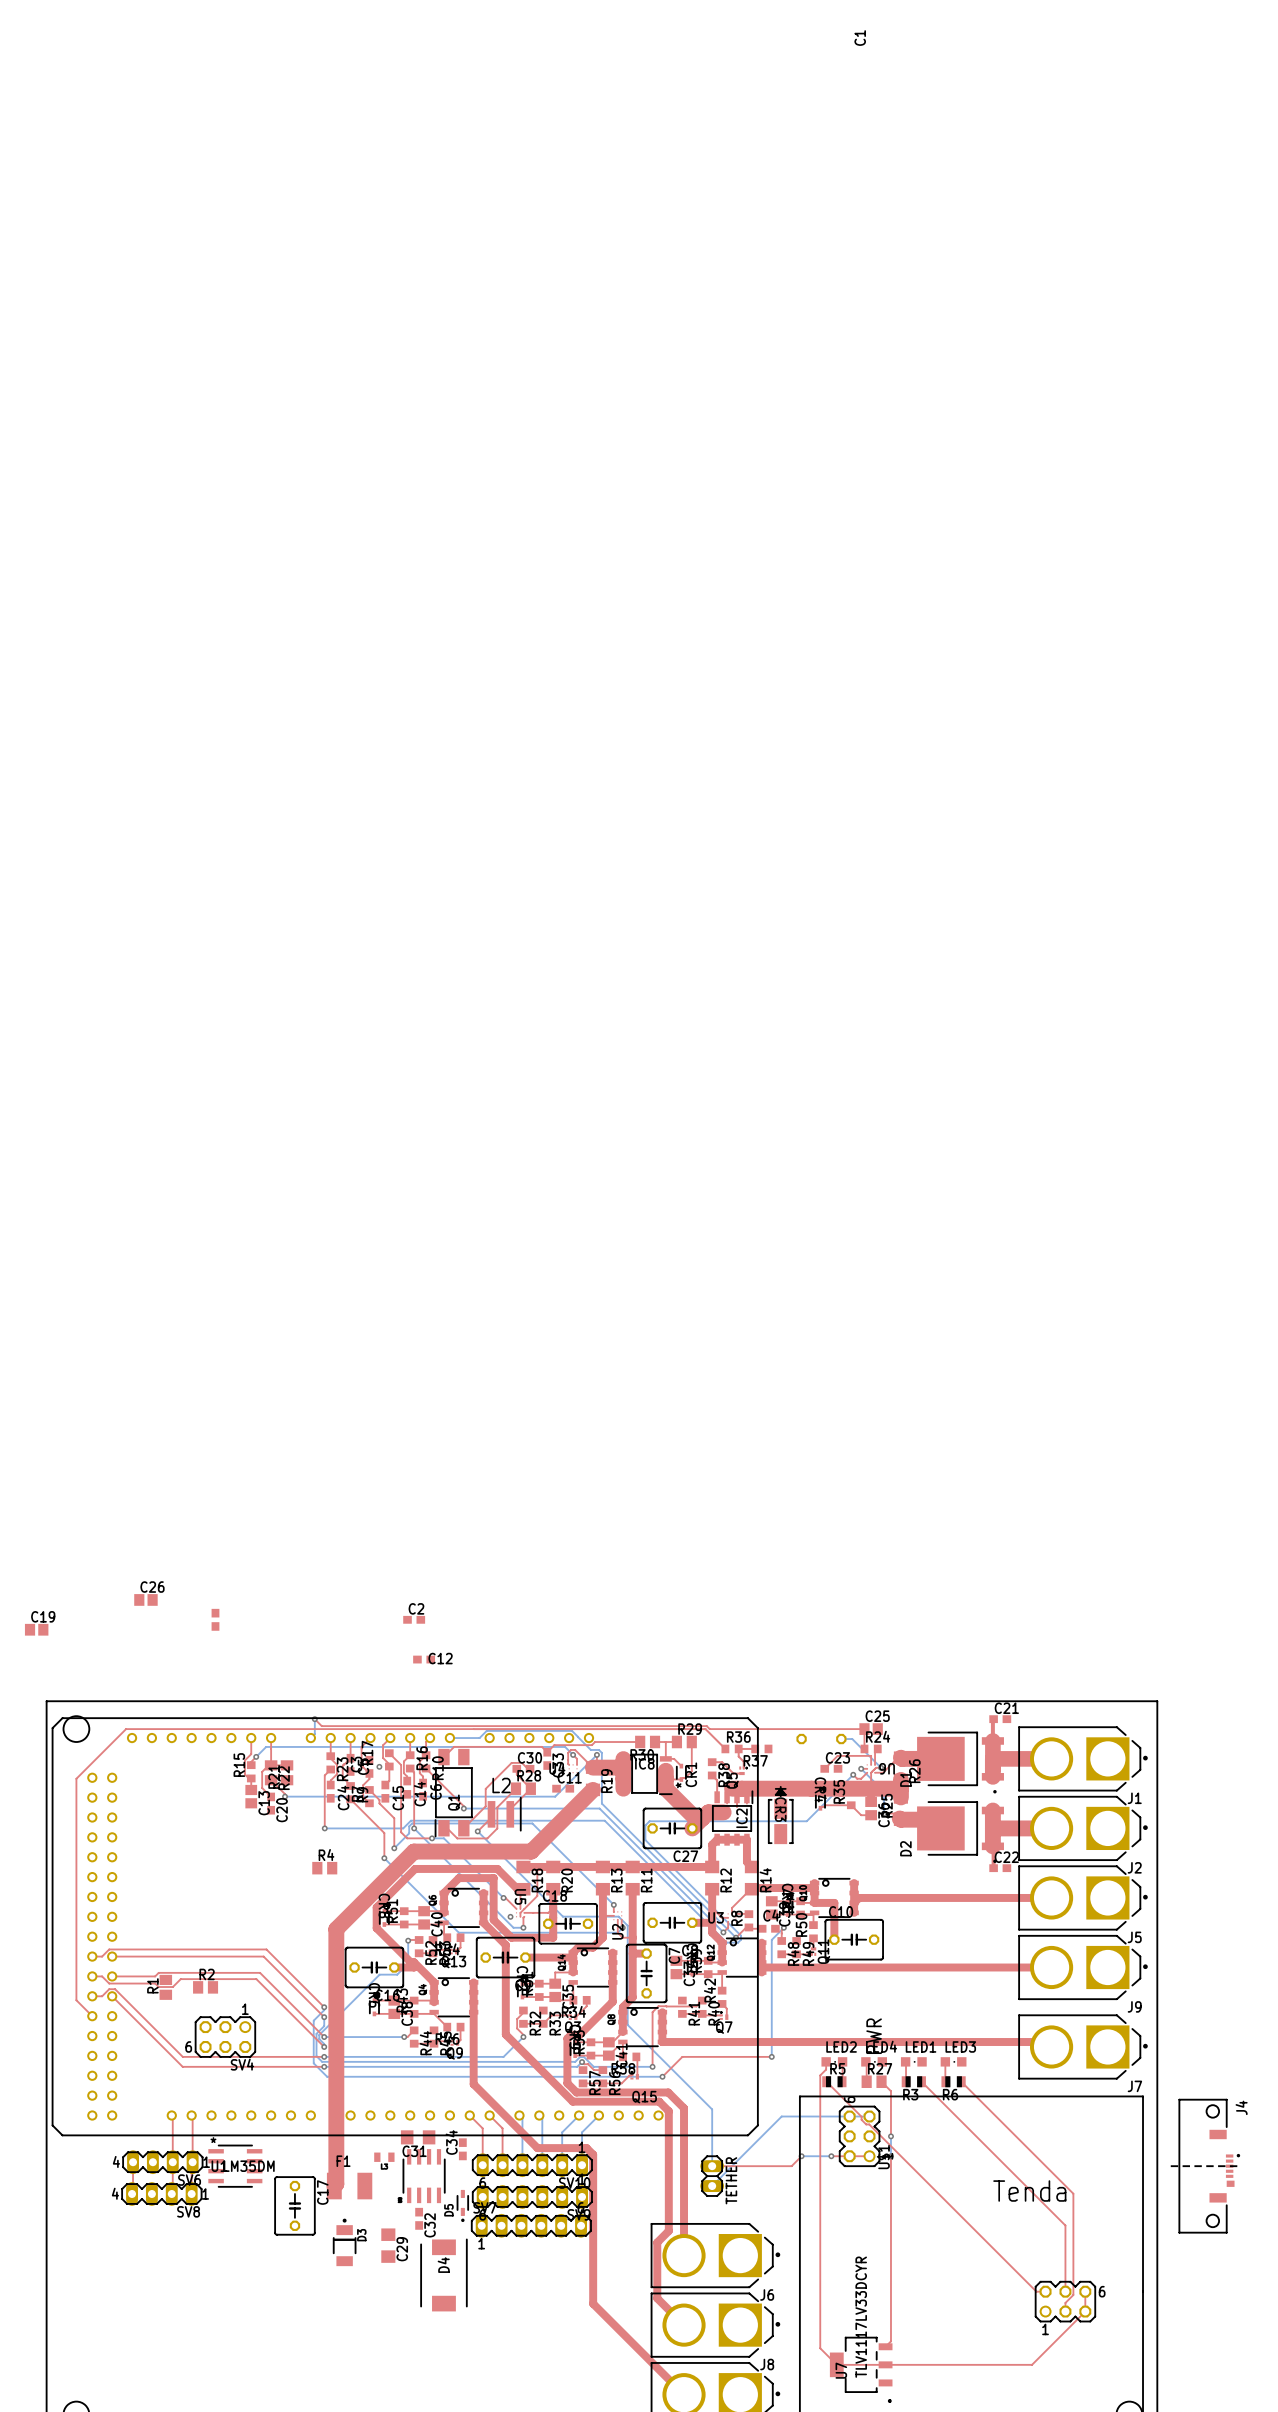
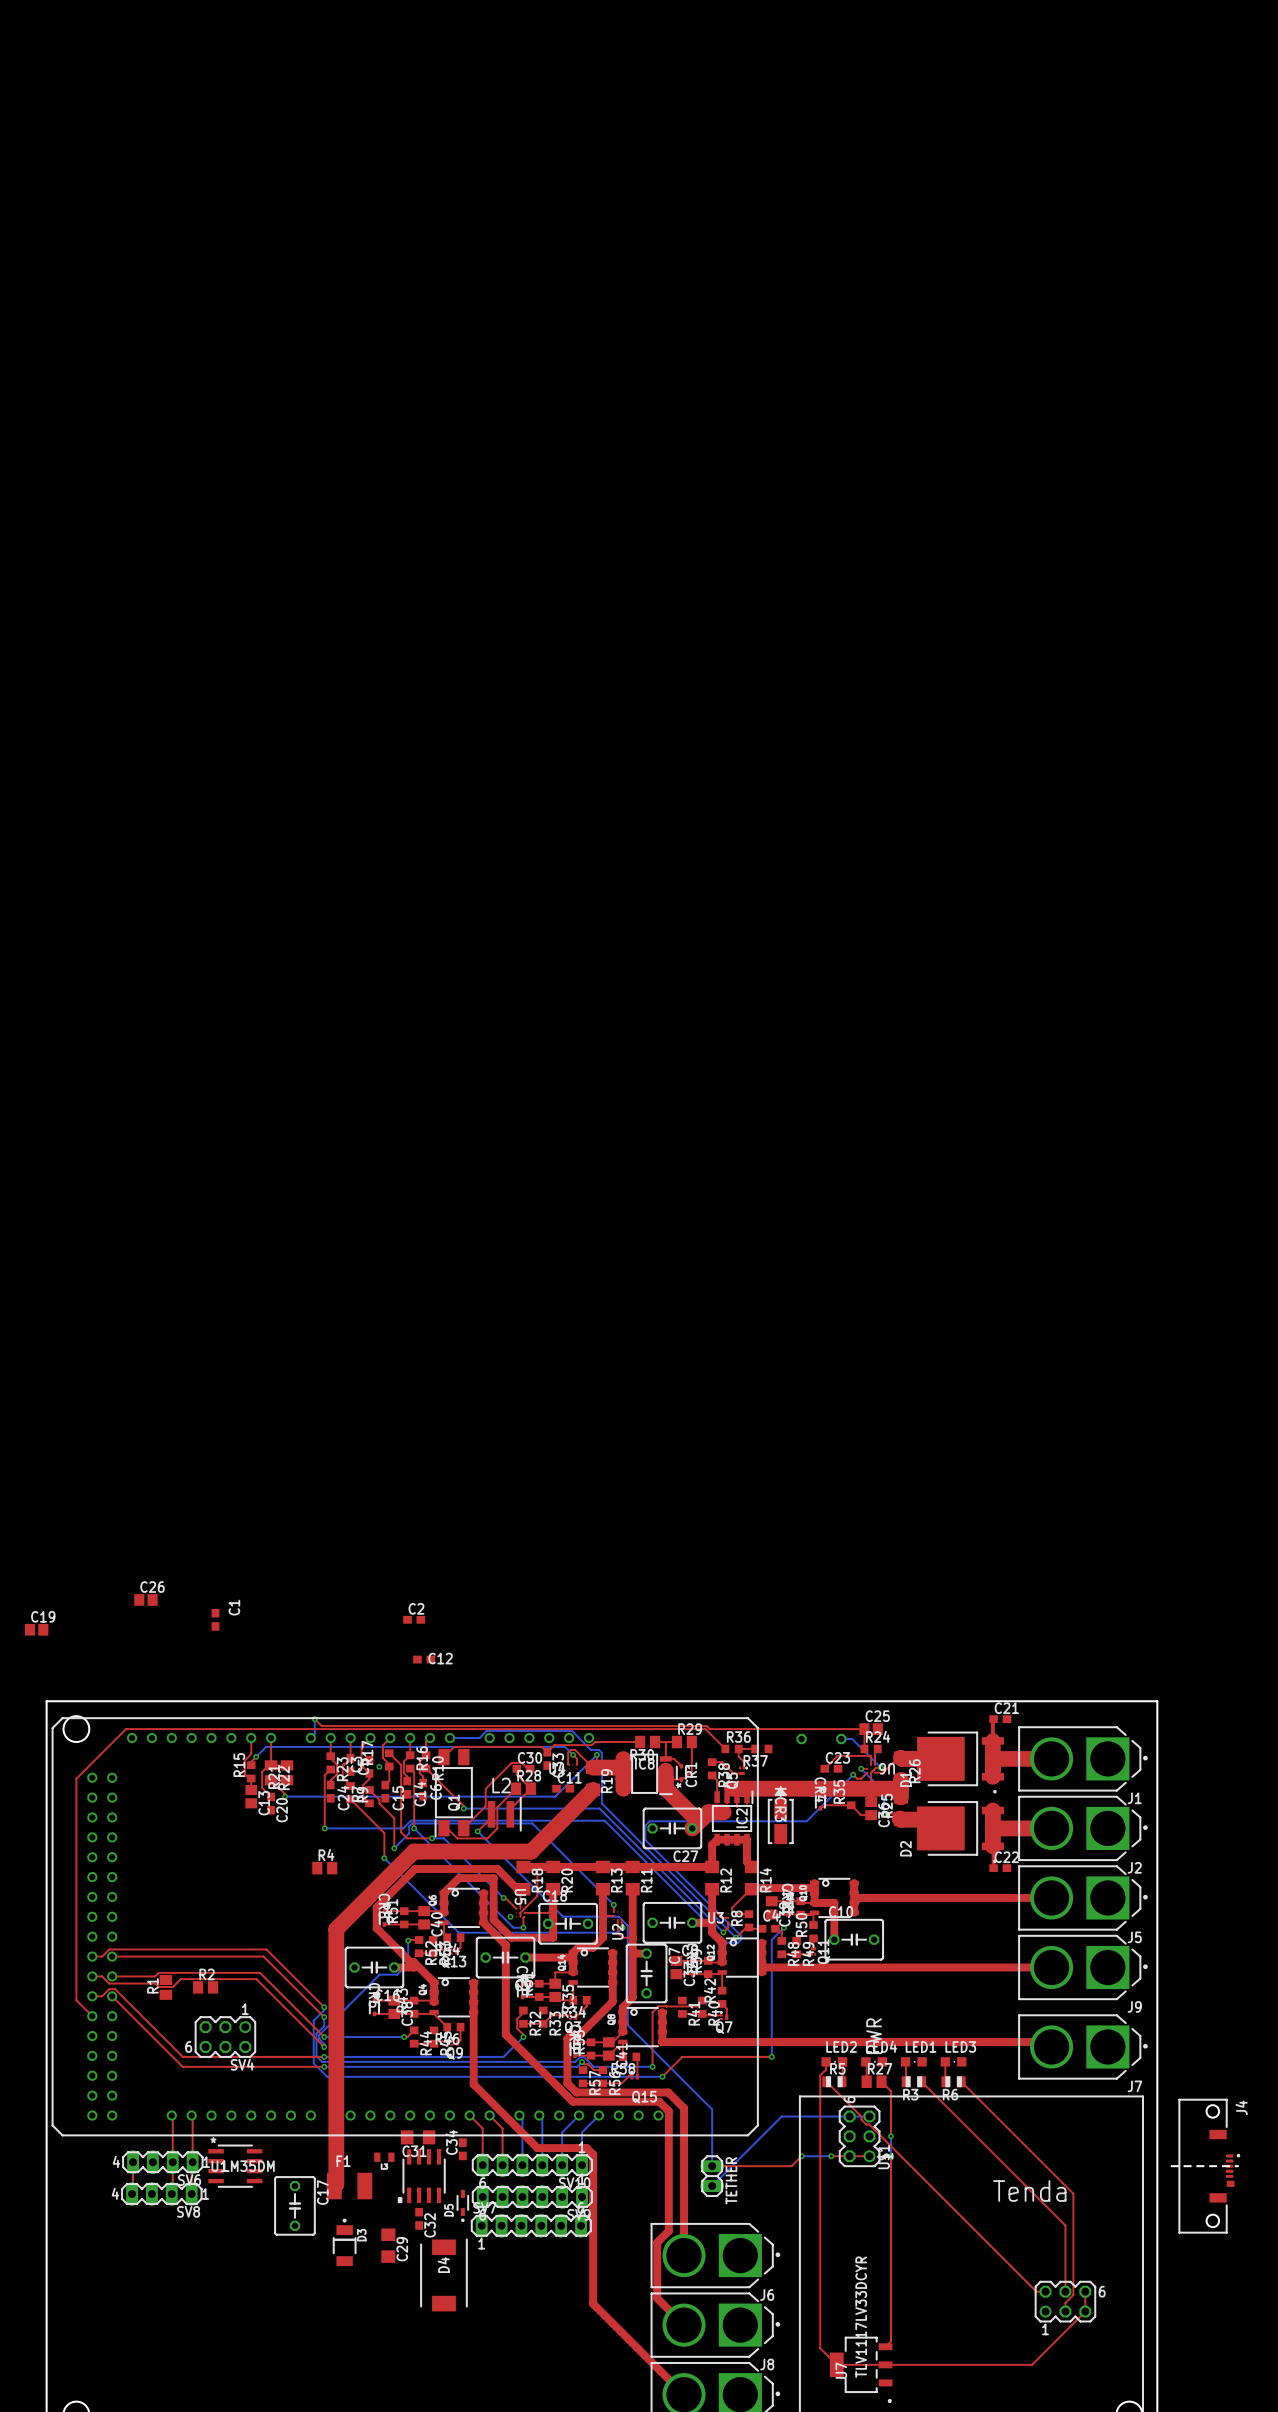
C1 name position: C1 (860, 38) -> C1 (234, 1607)

